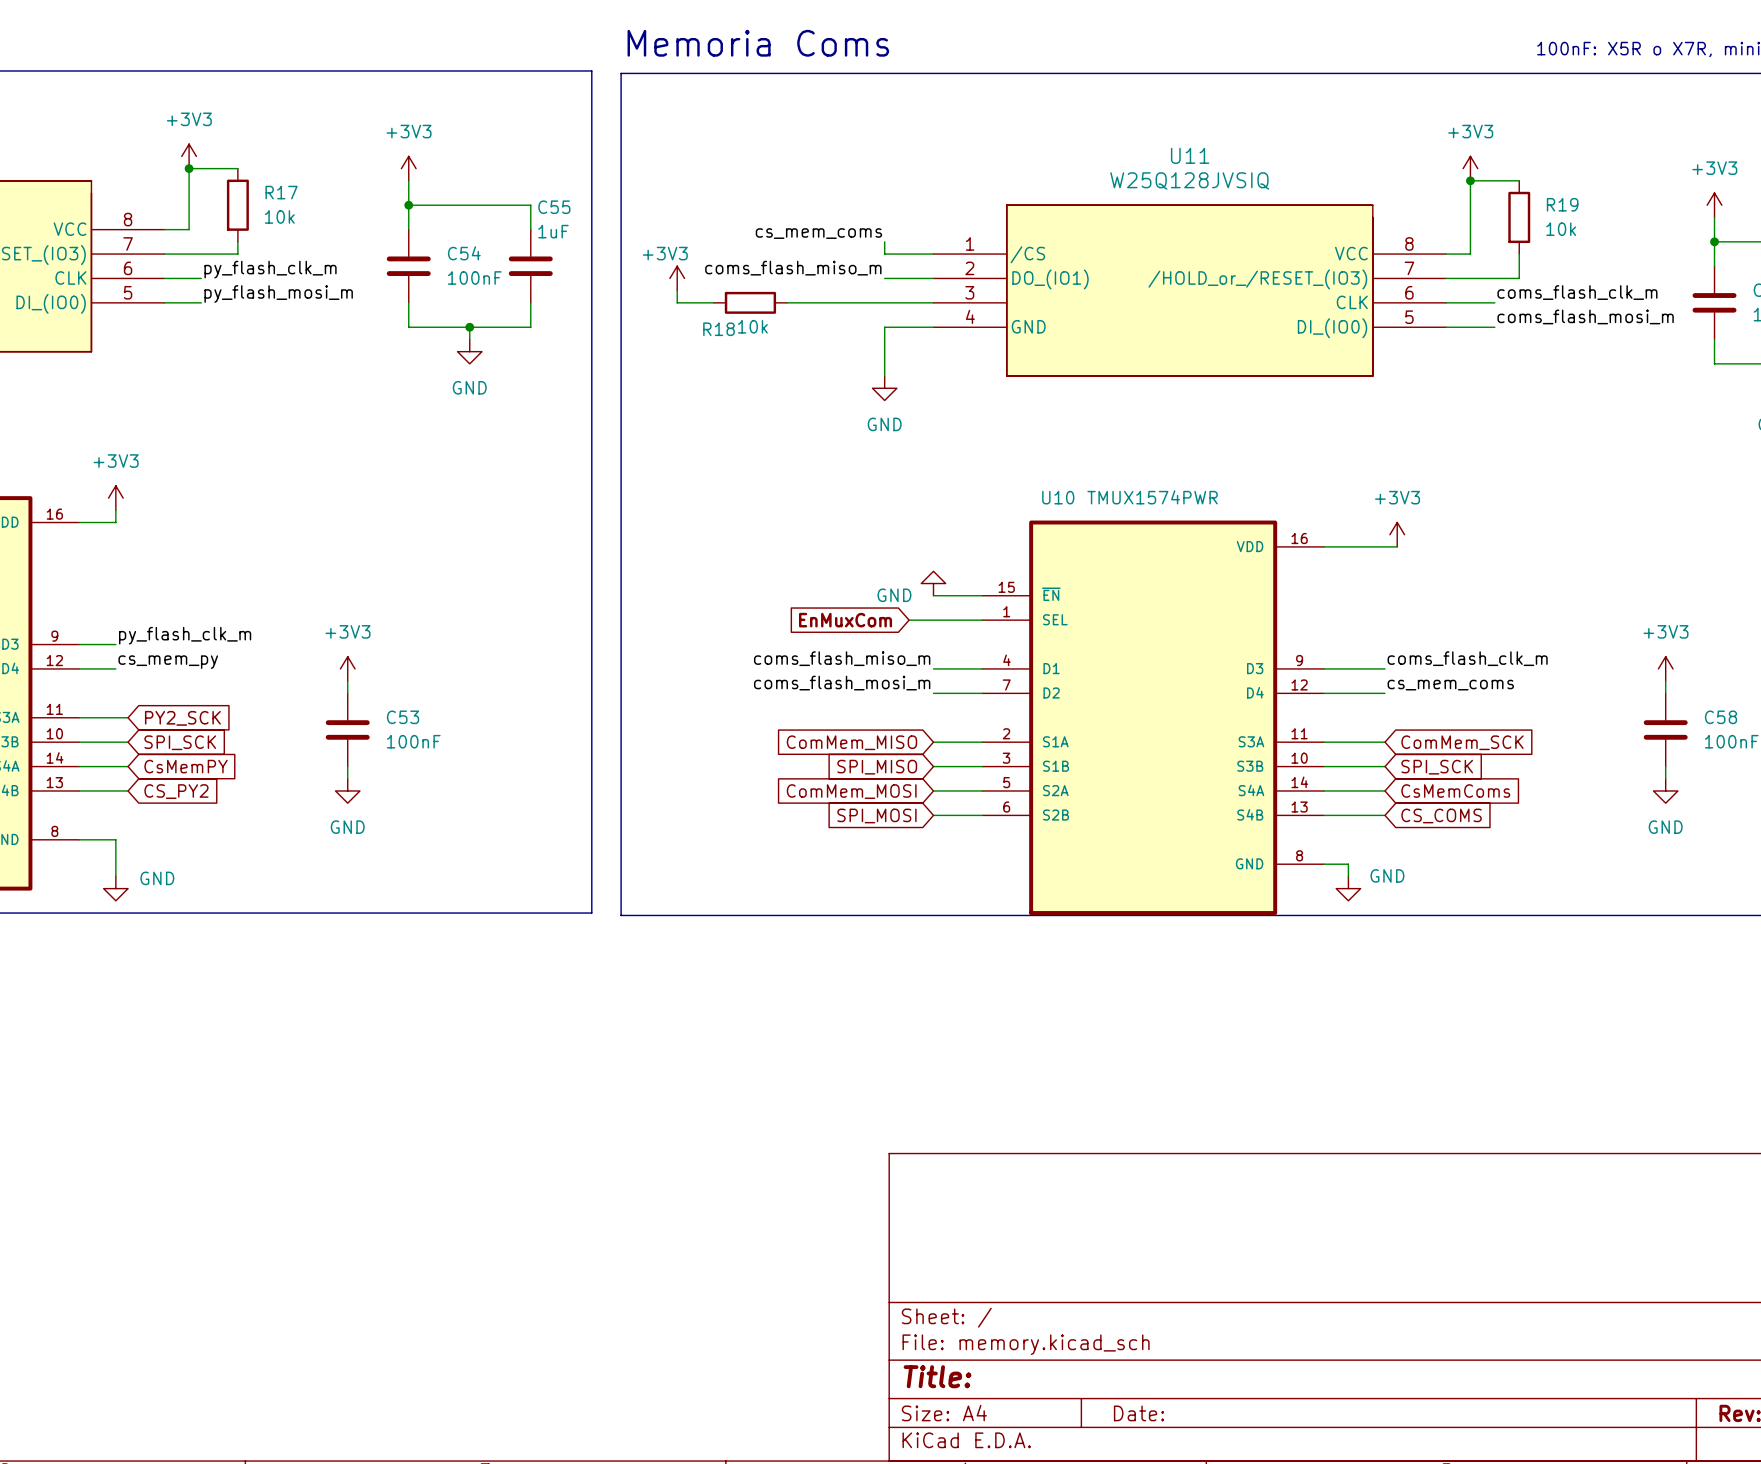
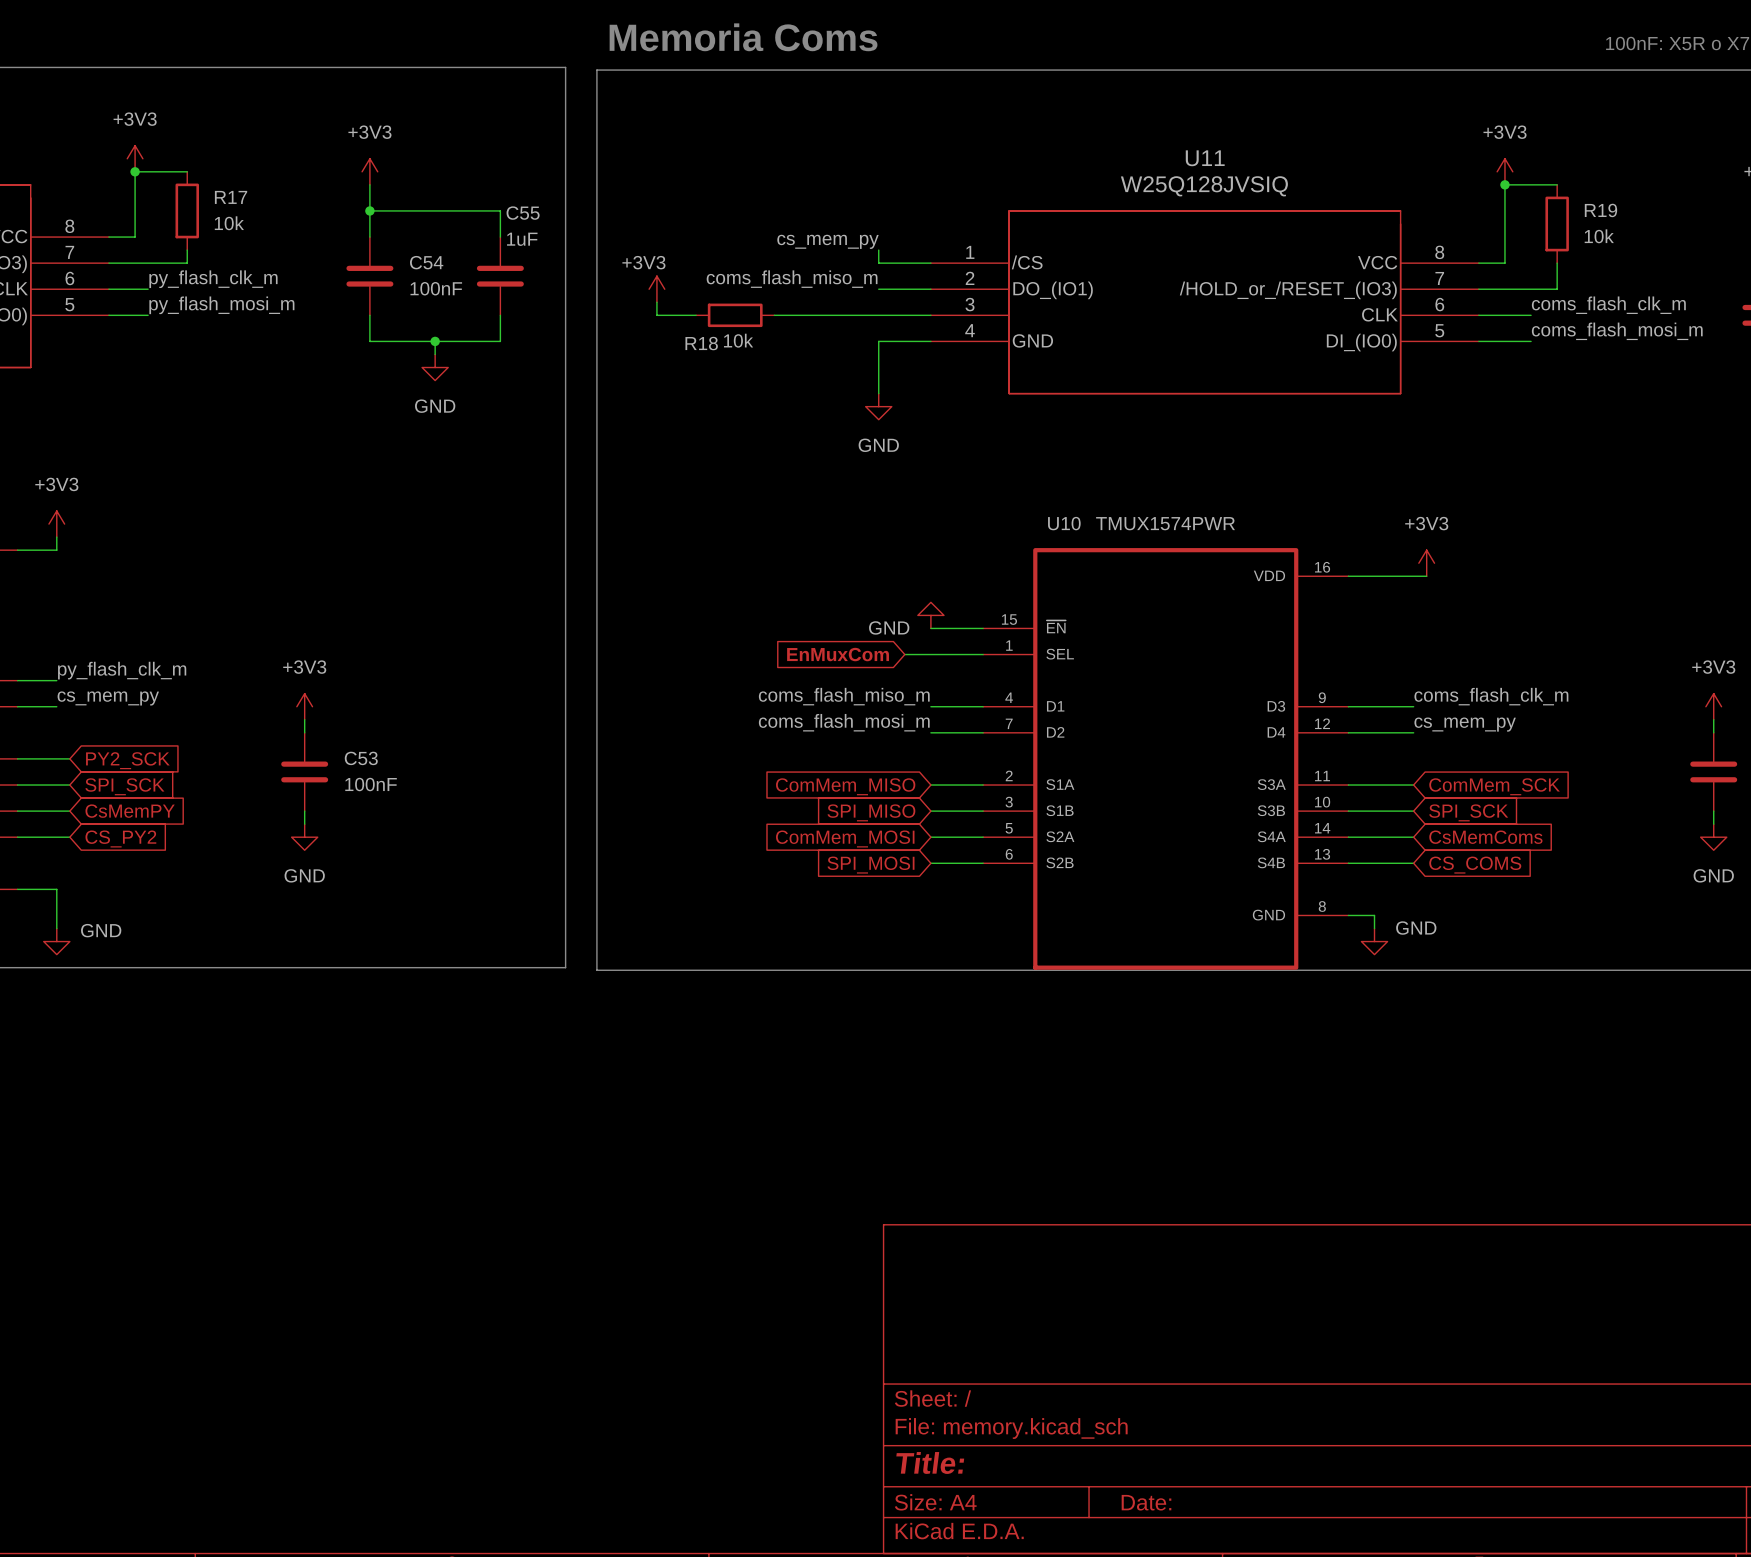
label: cs_mem_coms (818, 233) -> cs_mem_py (828, 241)
label: cs_mem_coms (1450, 685) -> cs_mem_py (1465, 724)

